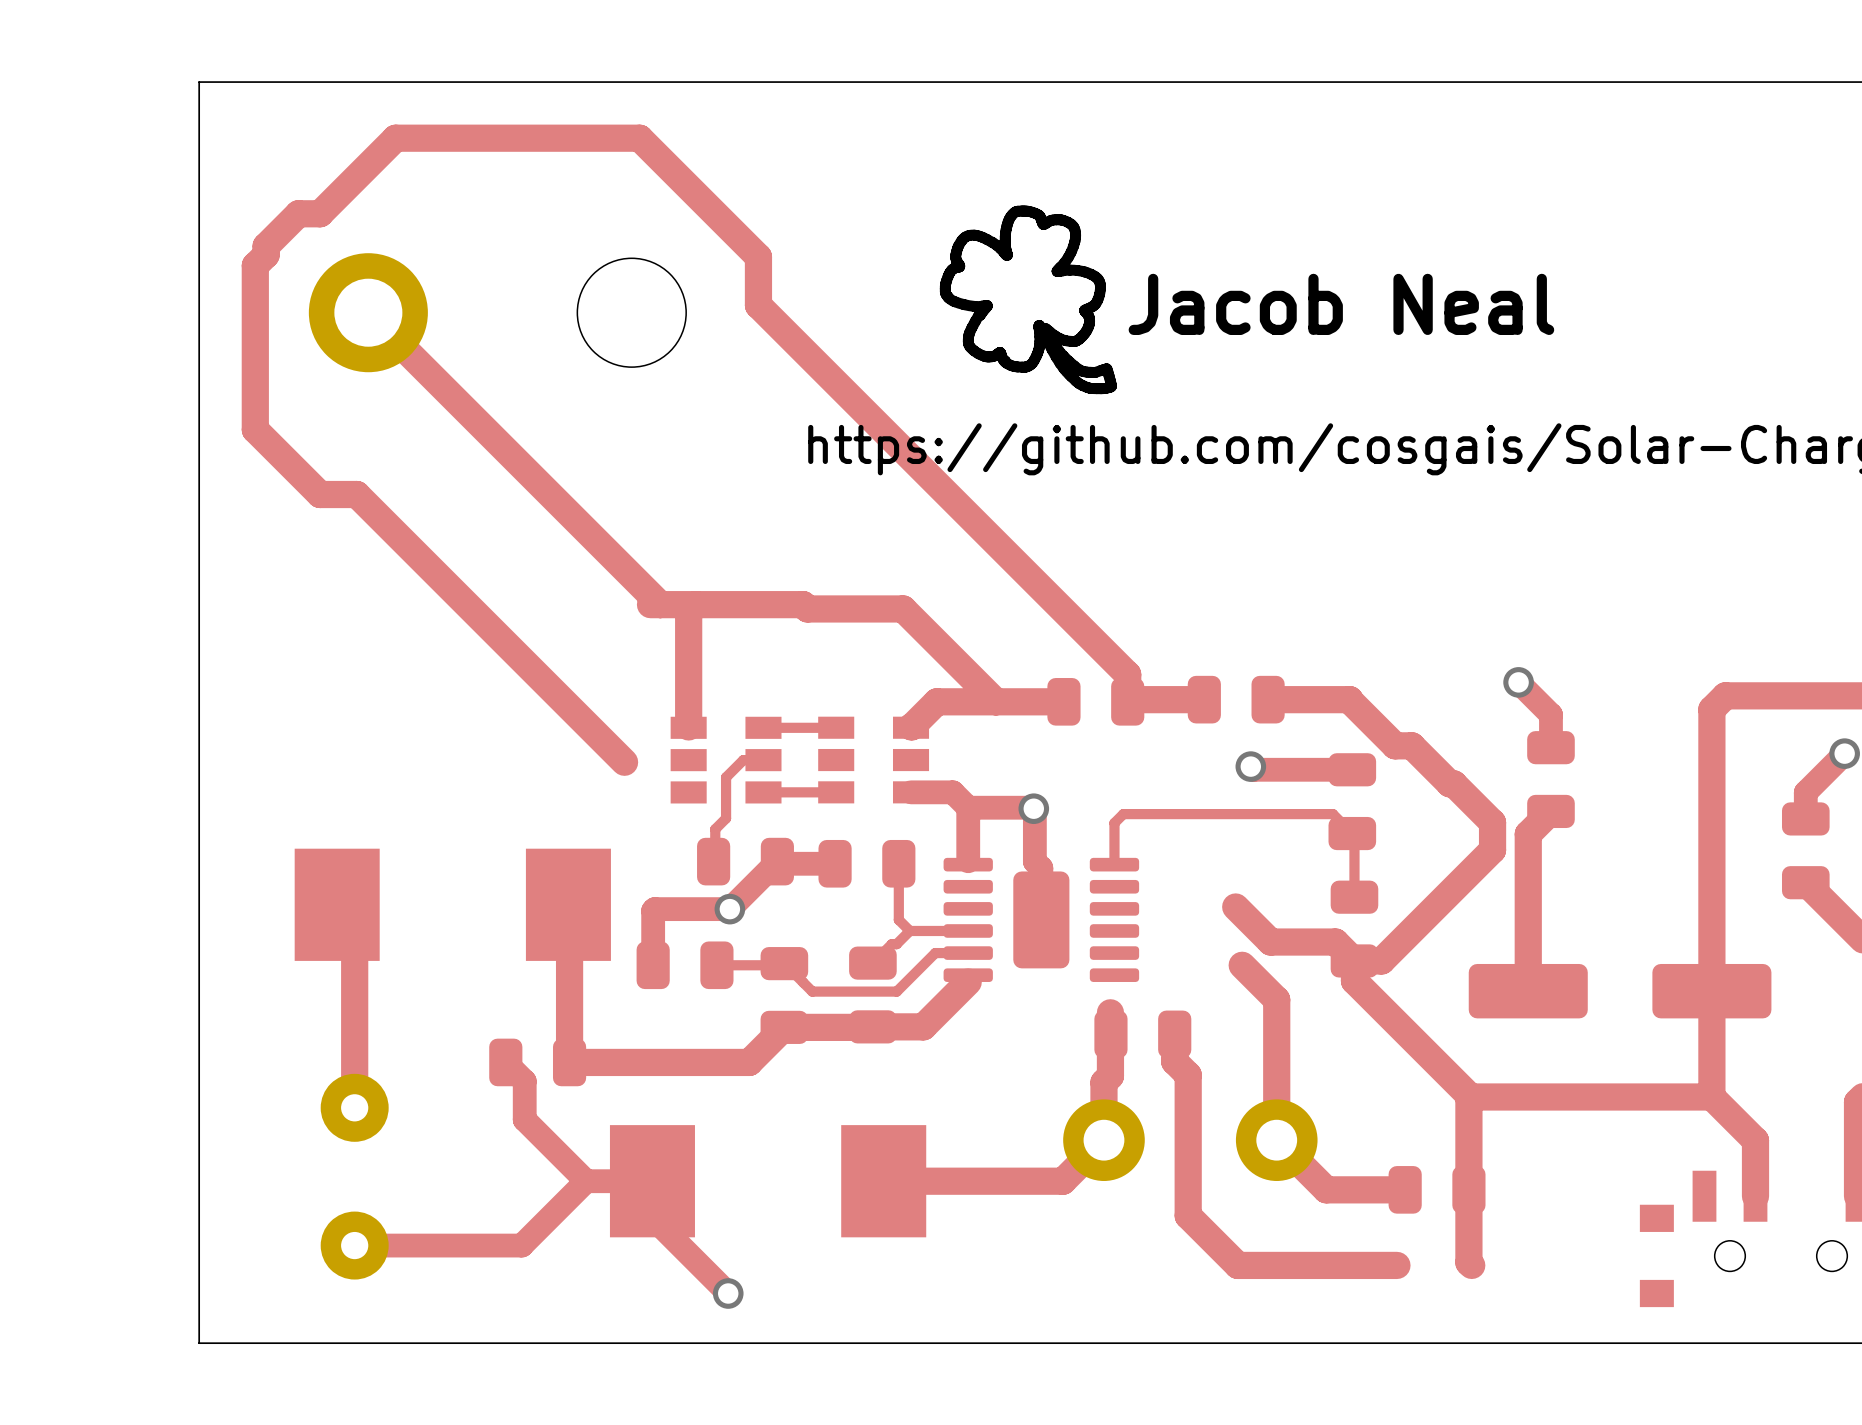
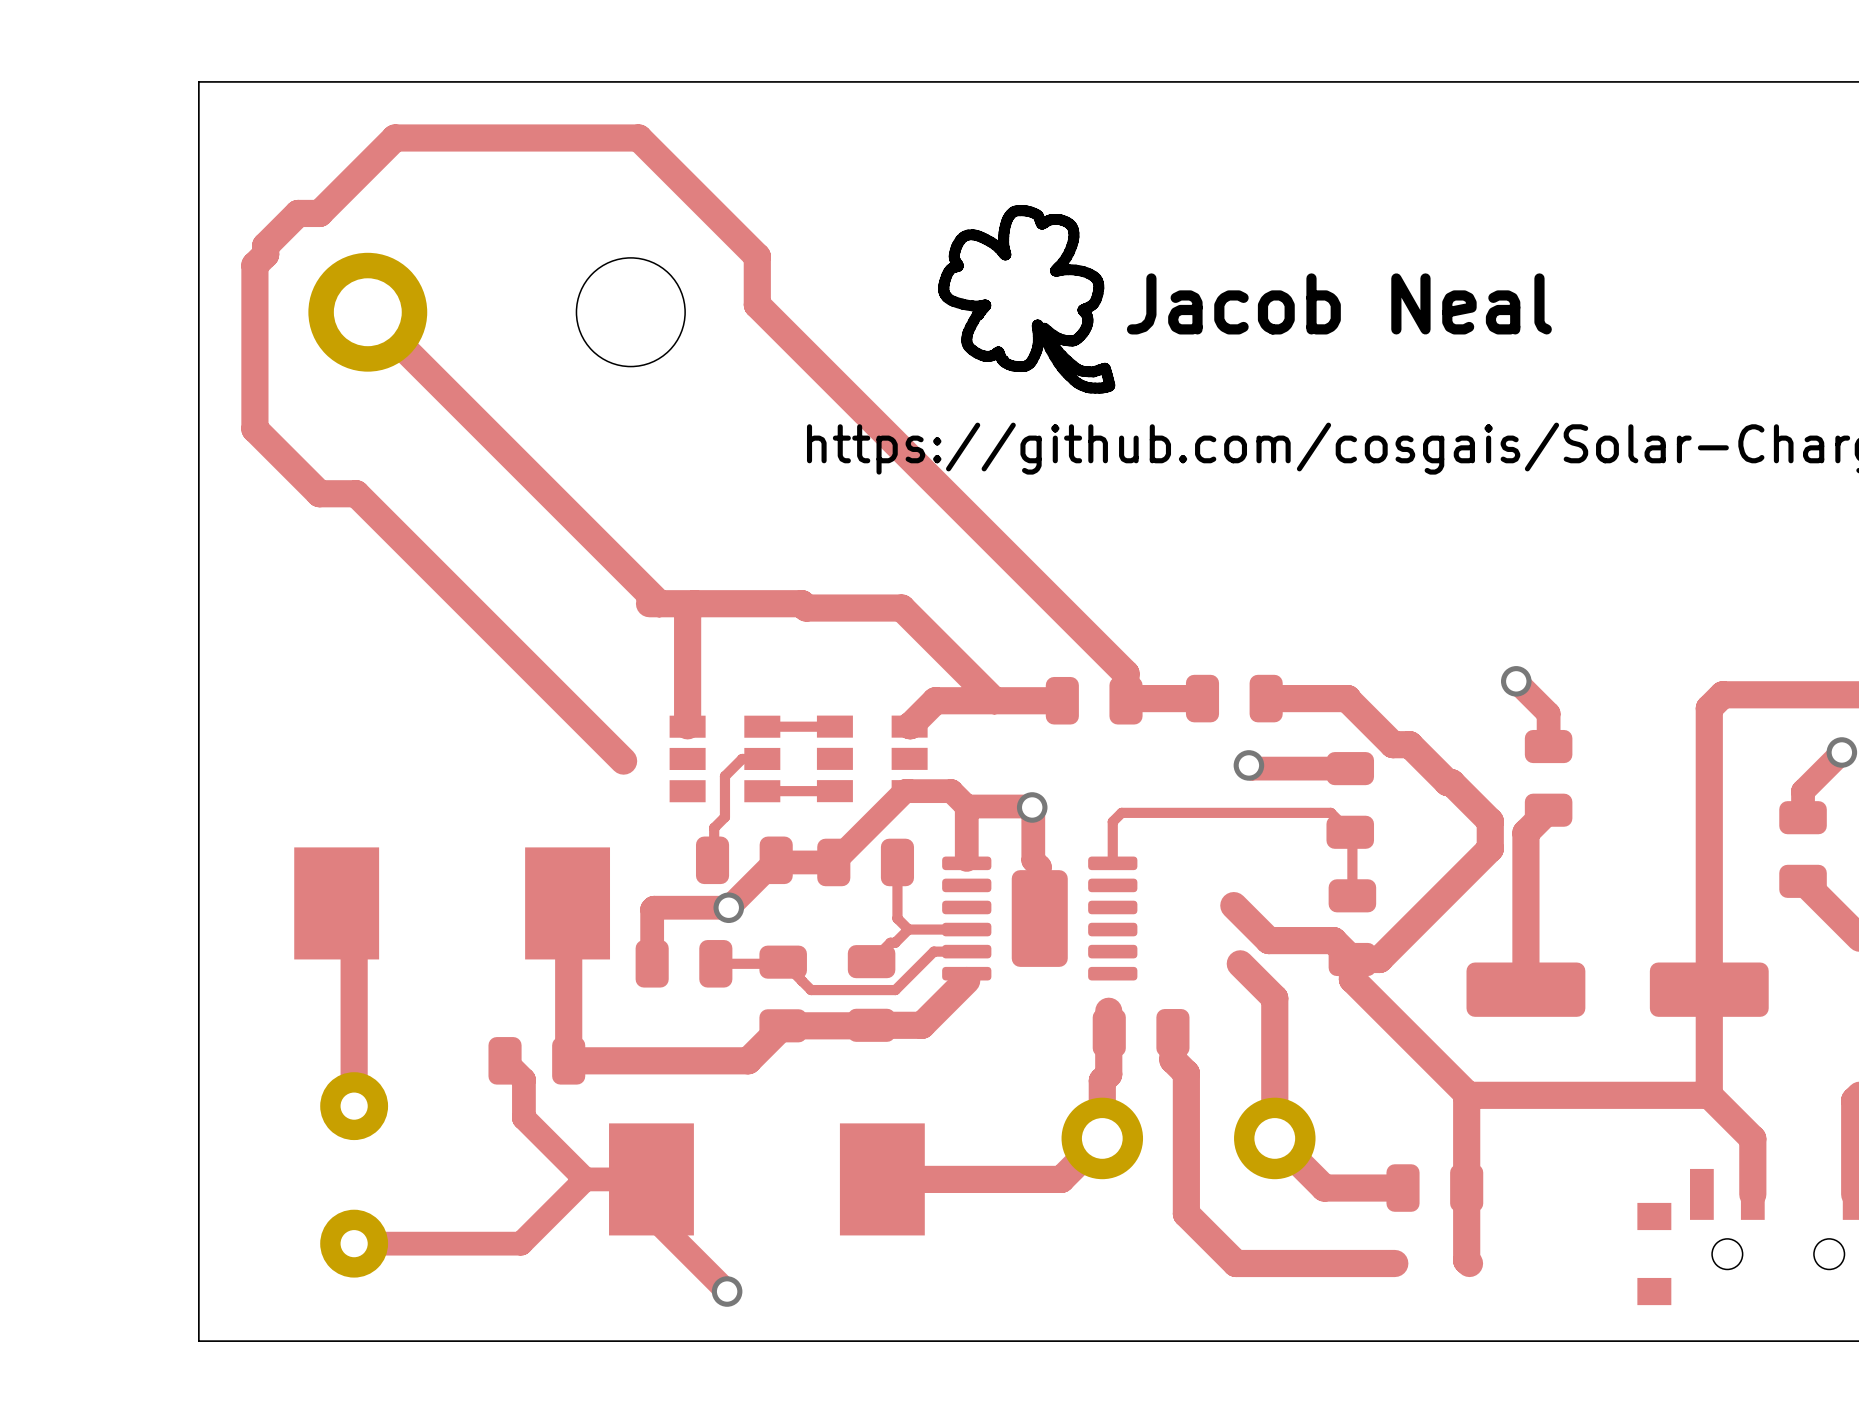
top track: none -> (909, 791) (905, 791) (833, 862)

